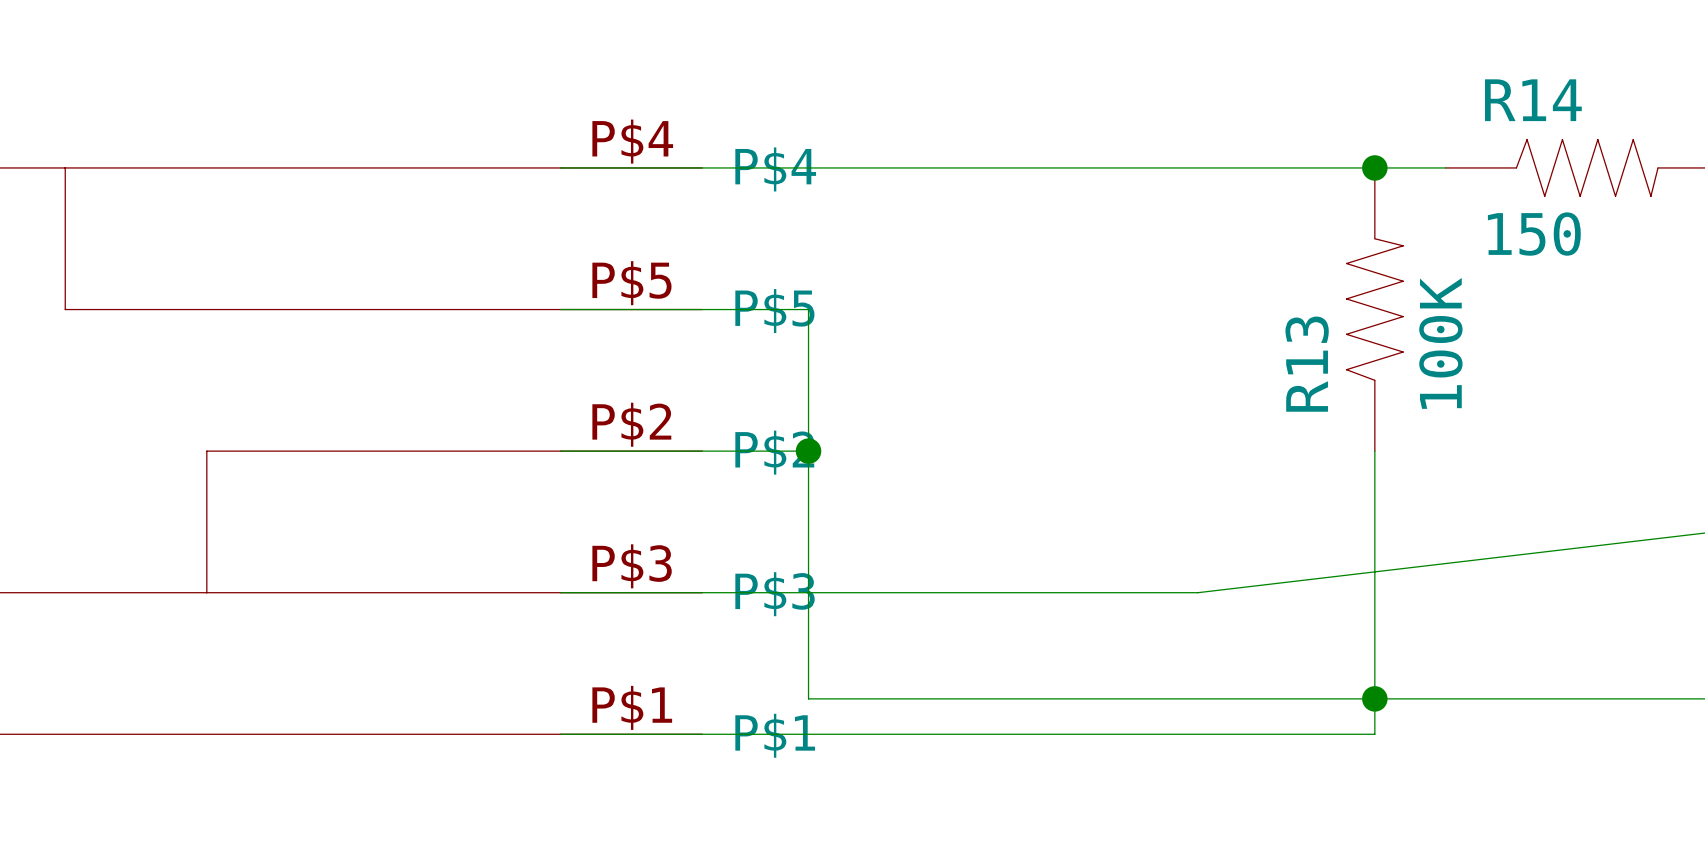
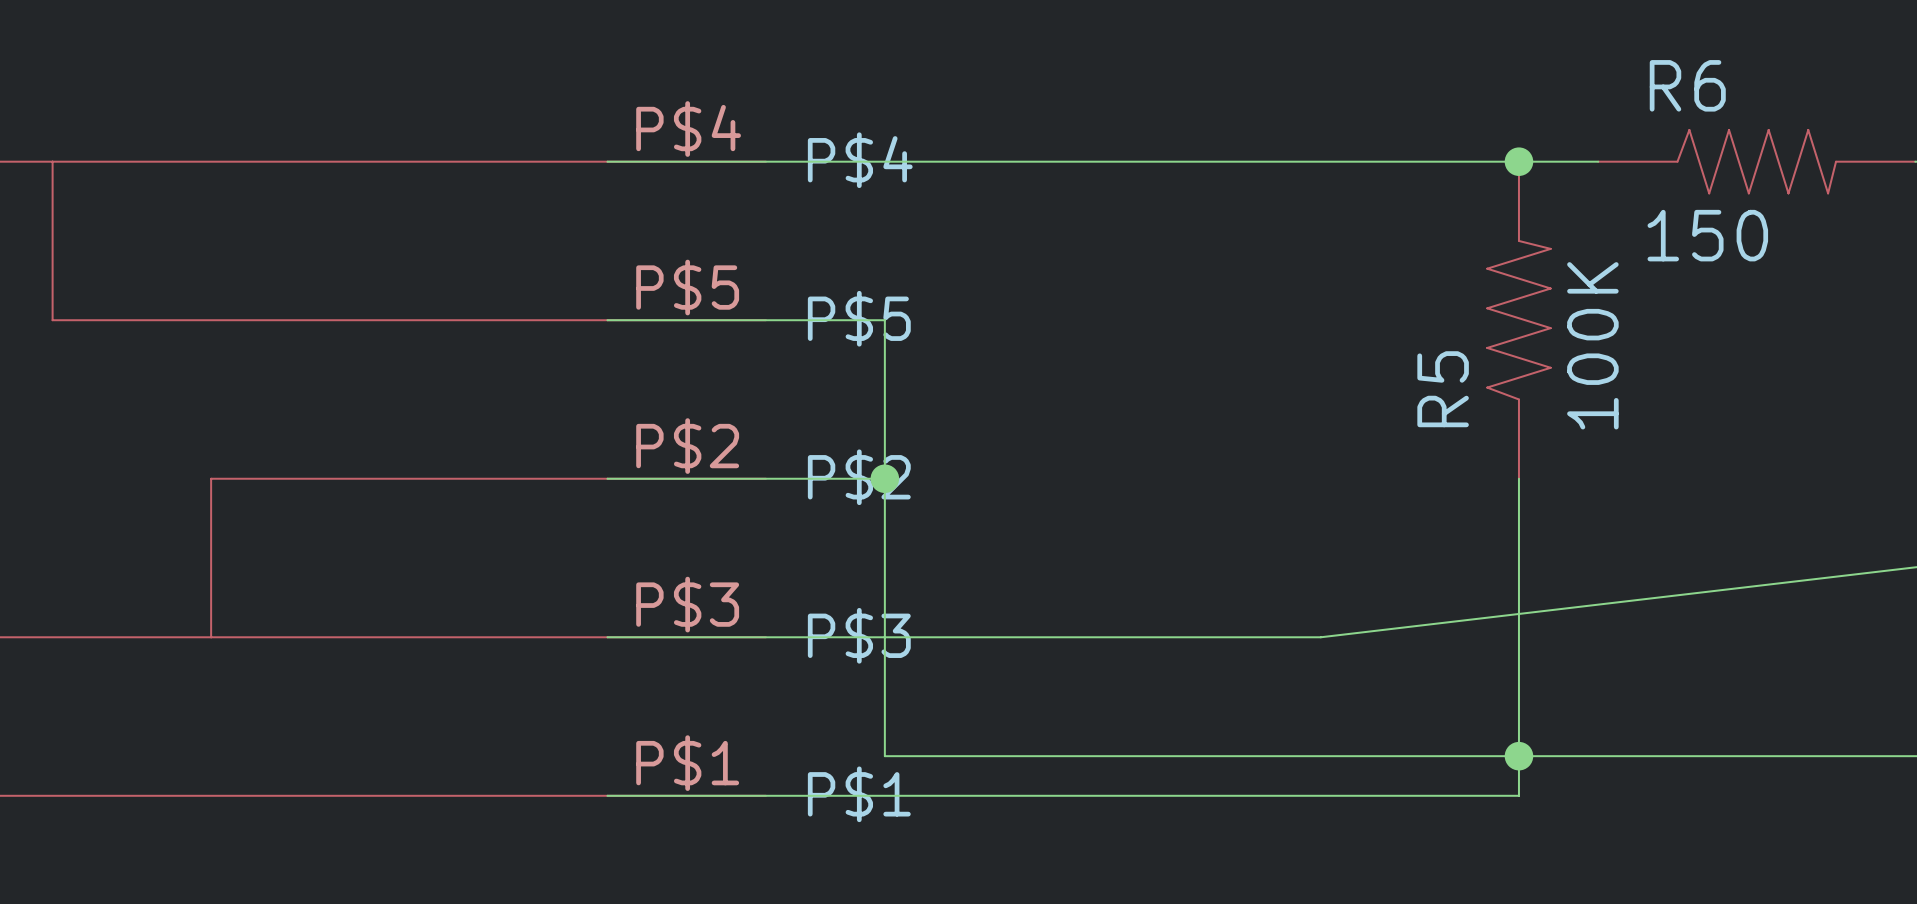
R14 name: R14 (1533, 100) -> R6 (1687, 85)
R13 name: R13 (1307, 364) -> R5 (1443, 389)

